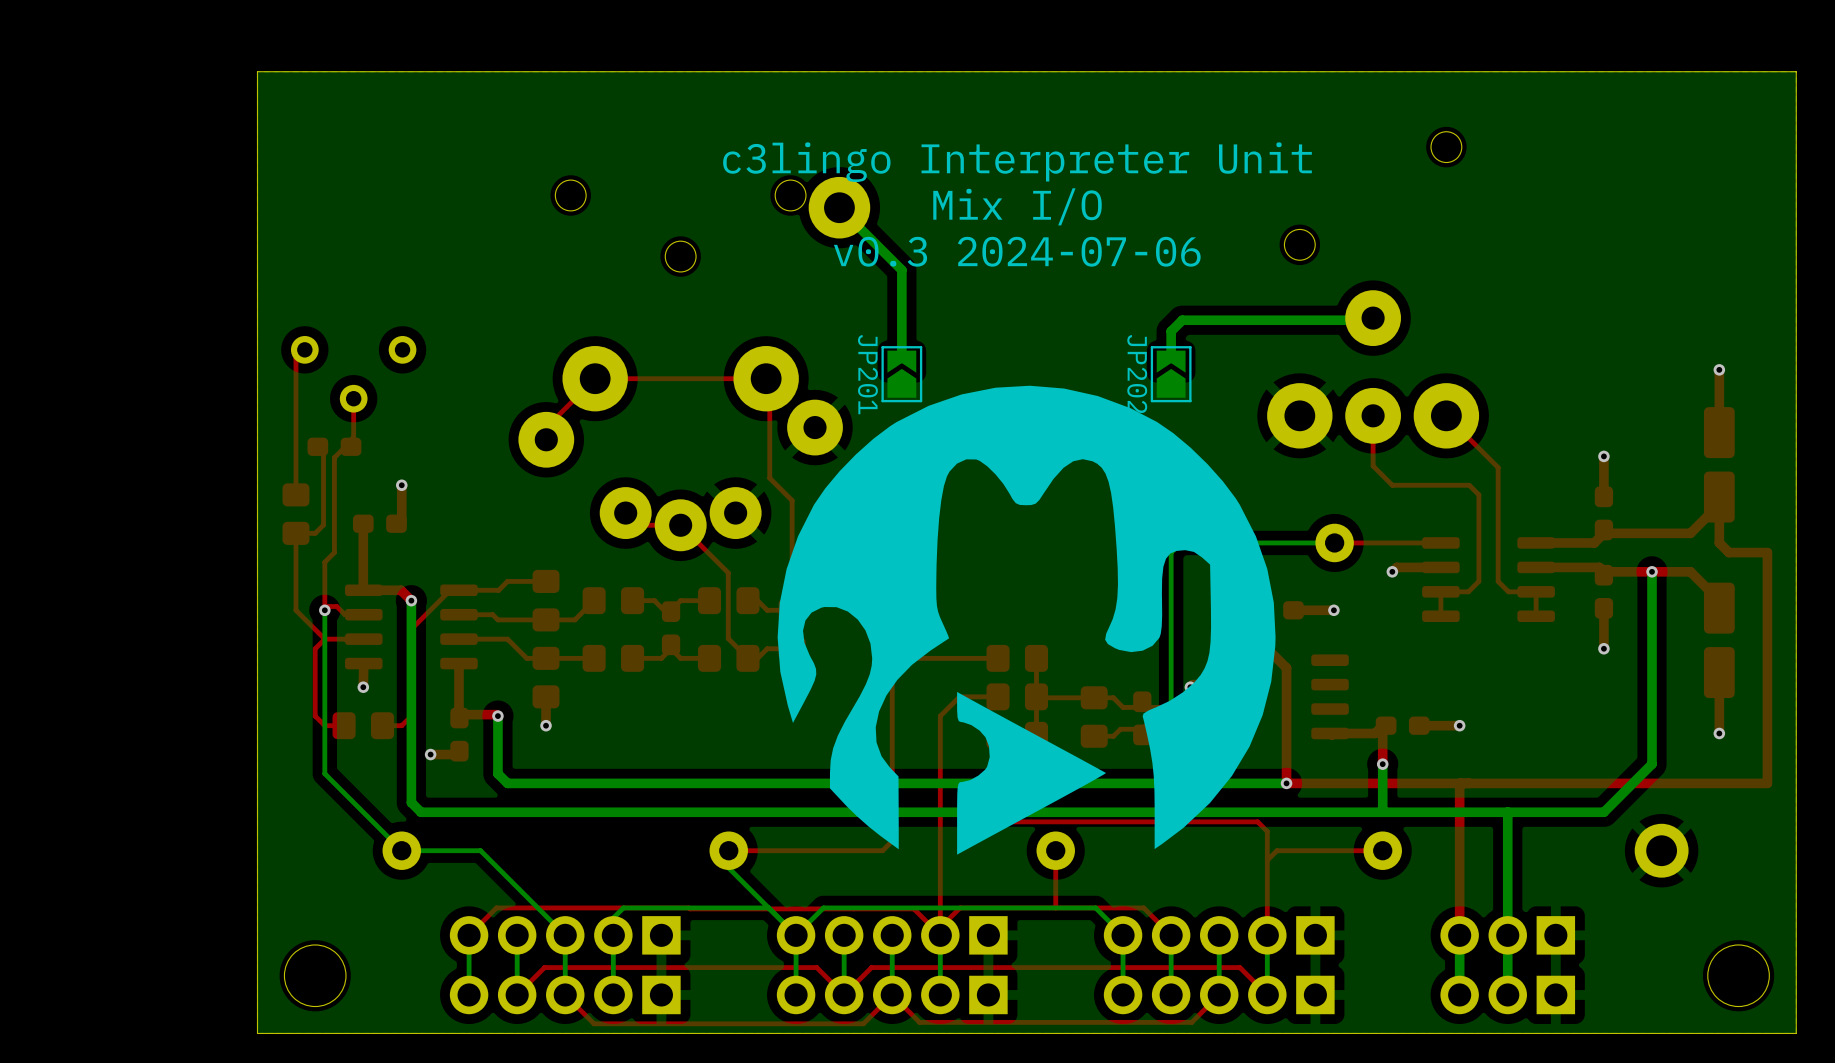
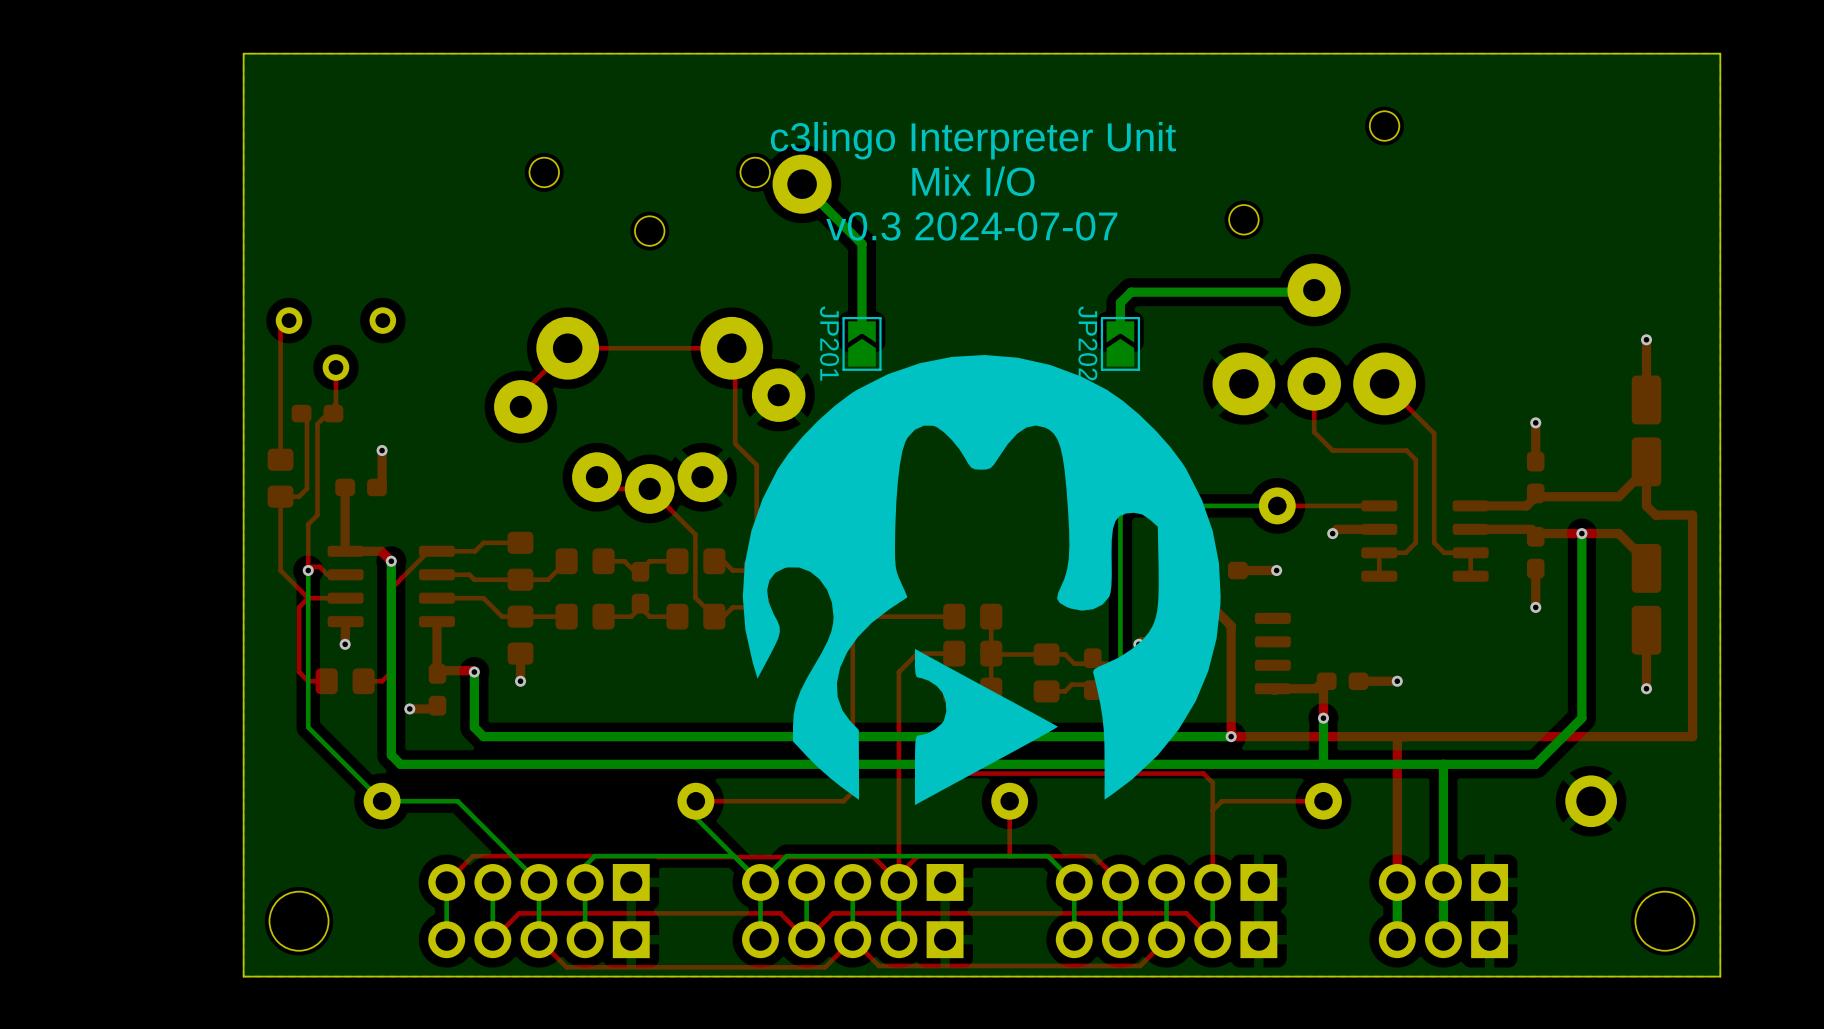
text: v0.3 2024-07-06 (1017, 251) -> v0.3 2024-07-07 (971, 226)

